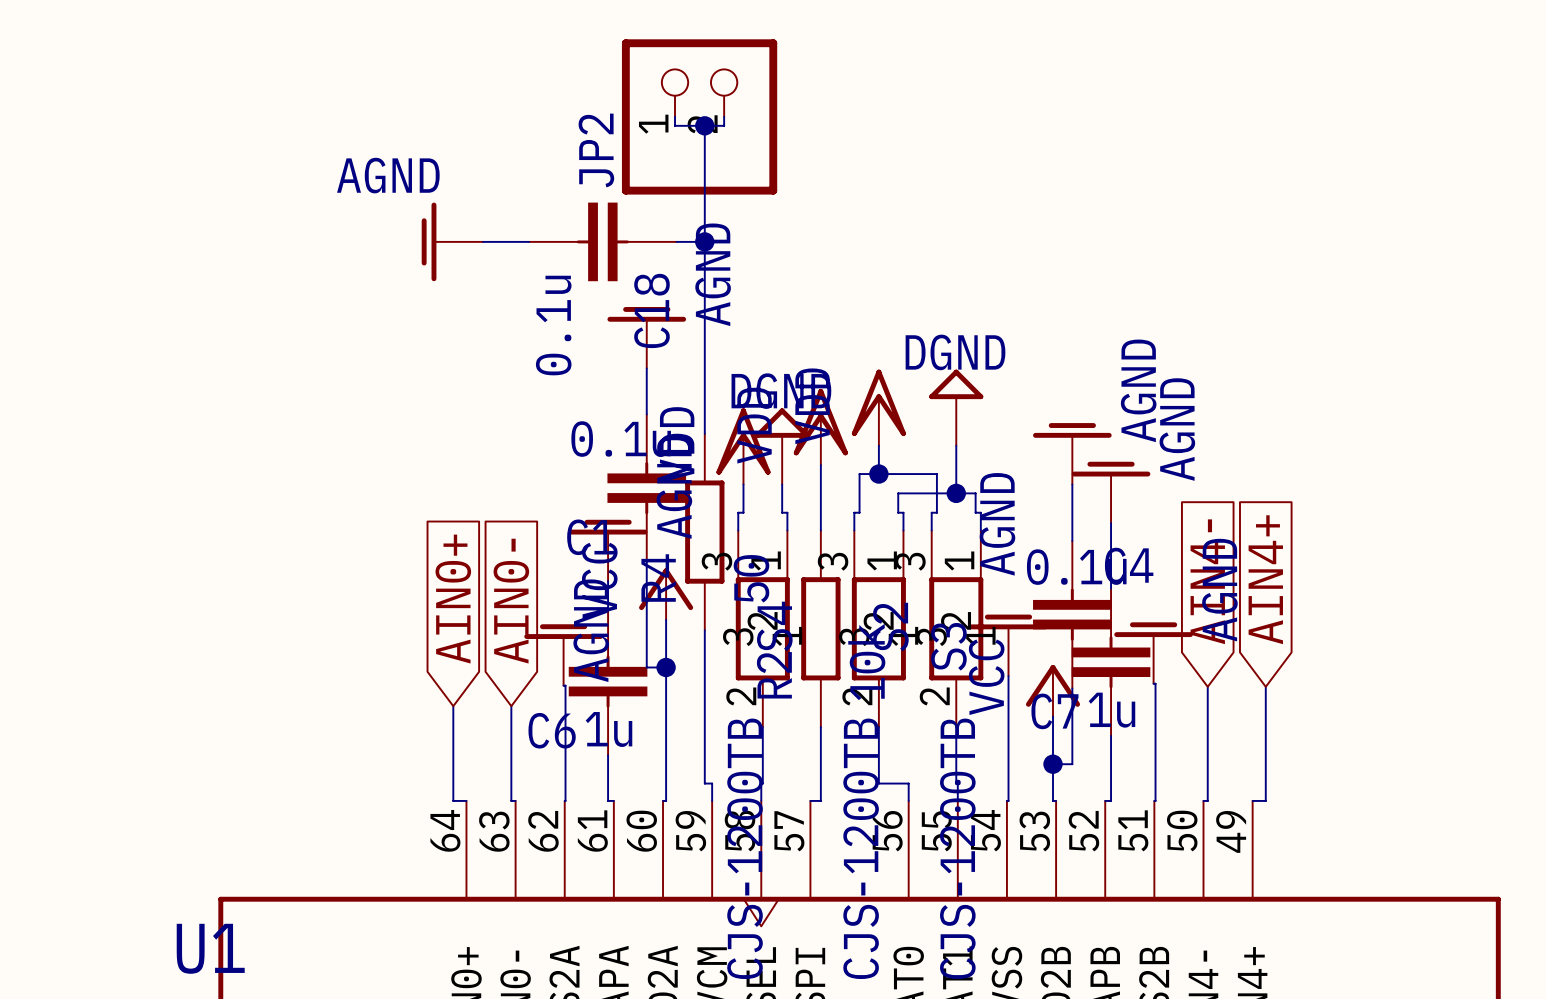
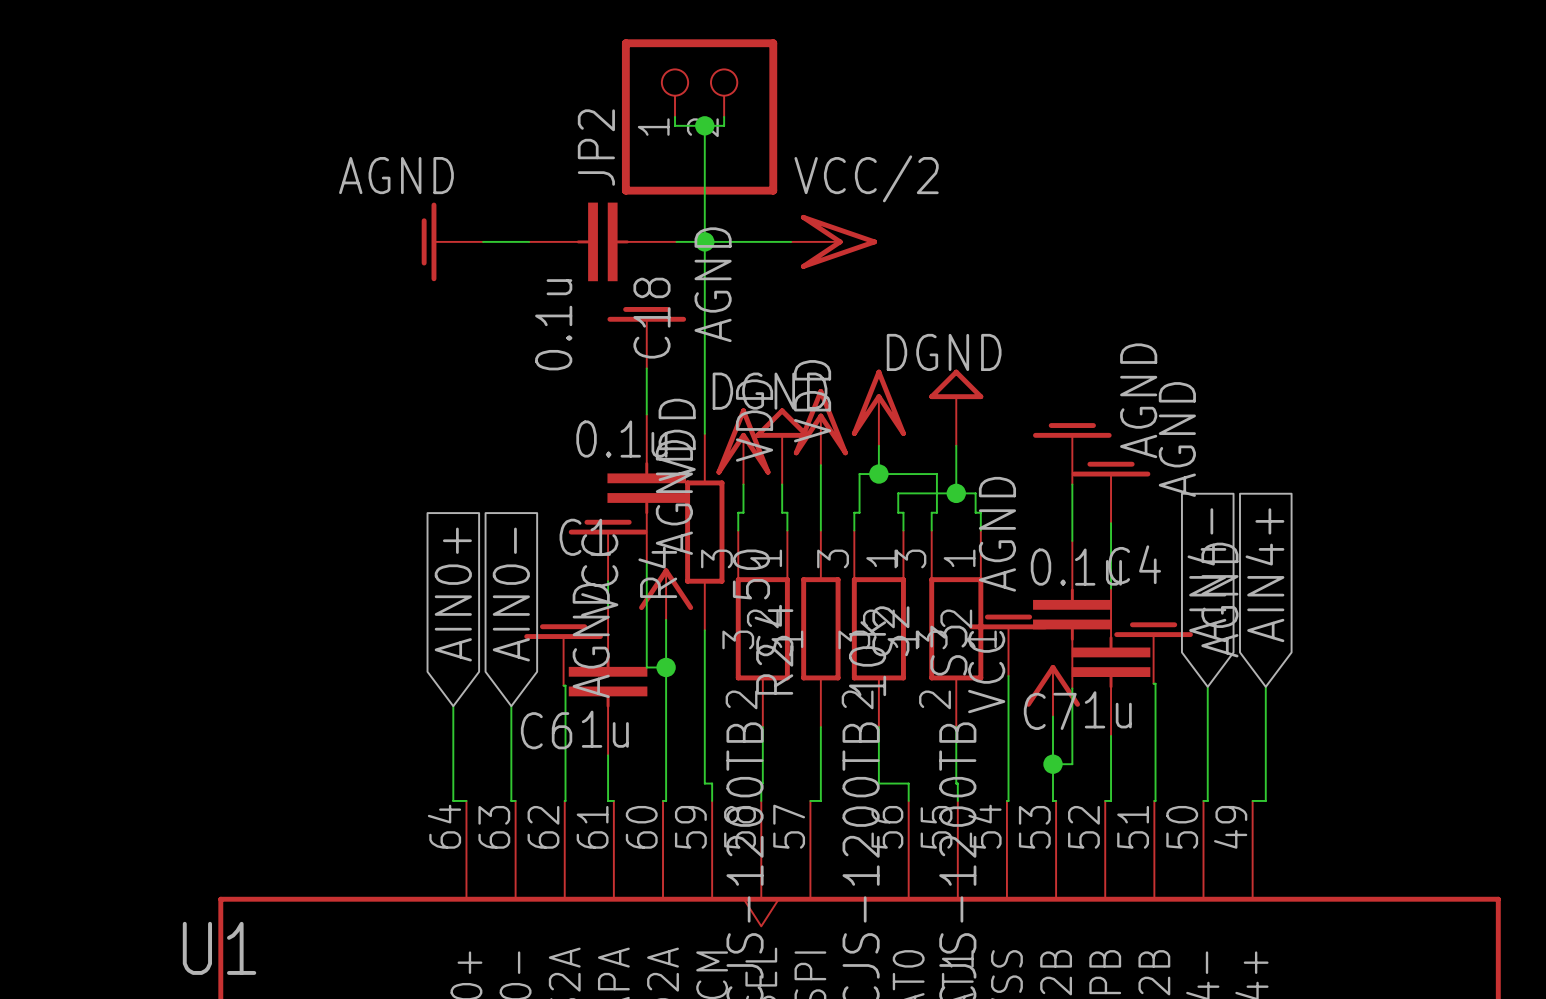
wire: none -> (704, 241) (791, 241)
power symbol: none -> VCC/2 (834, 241)

